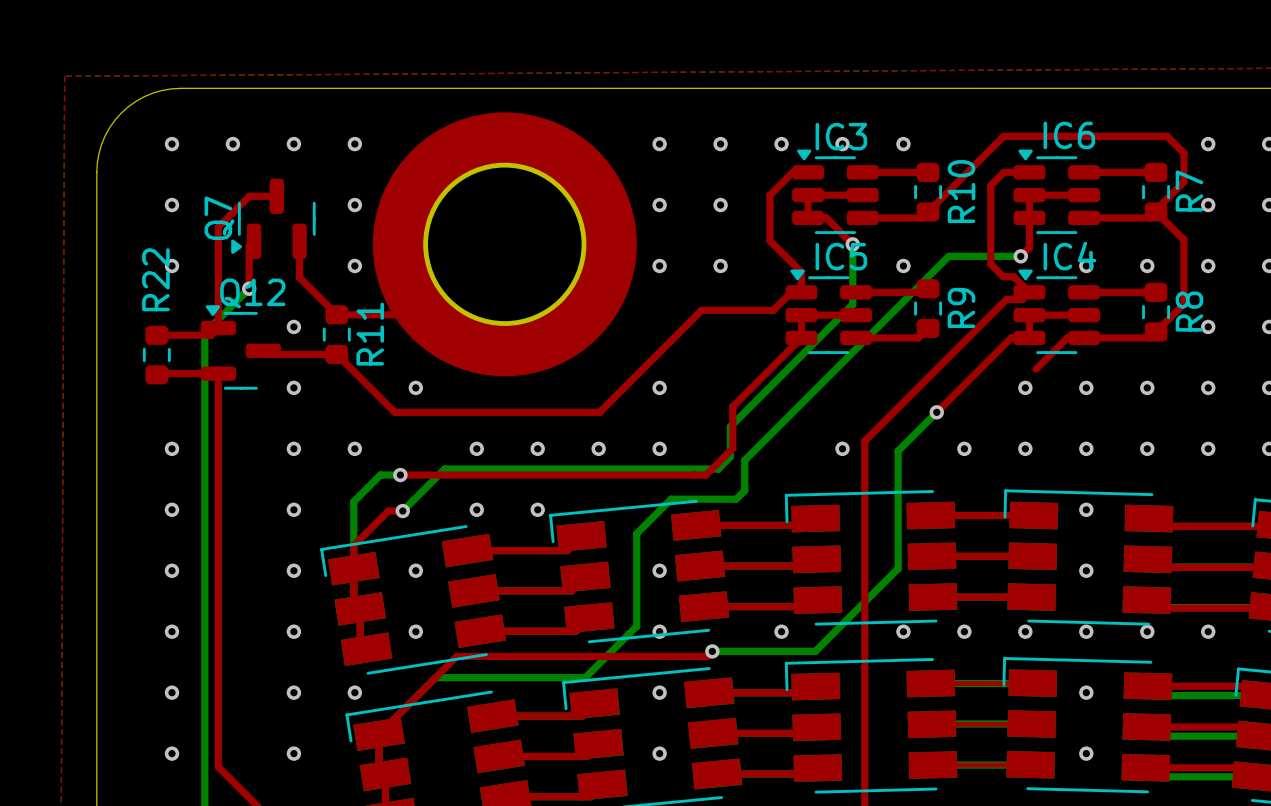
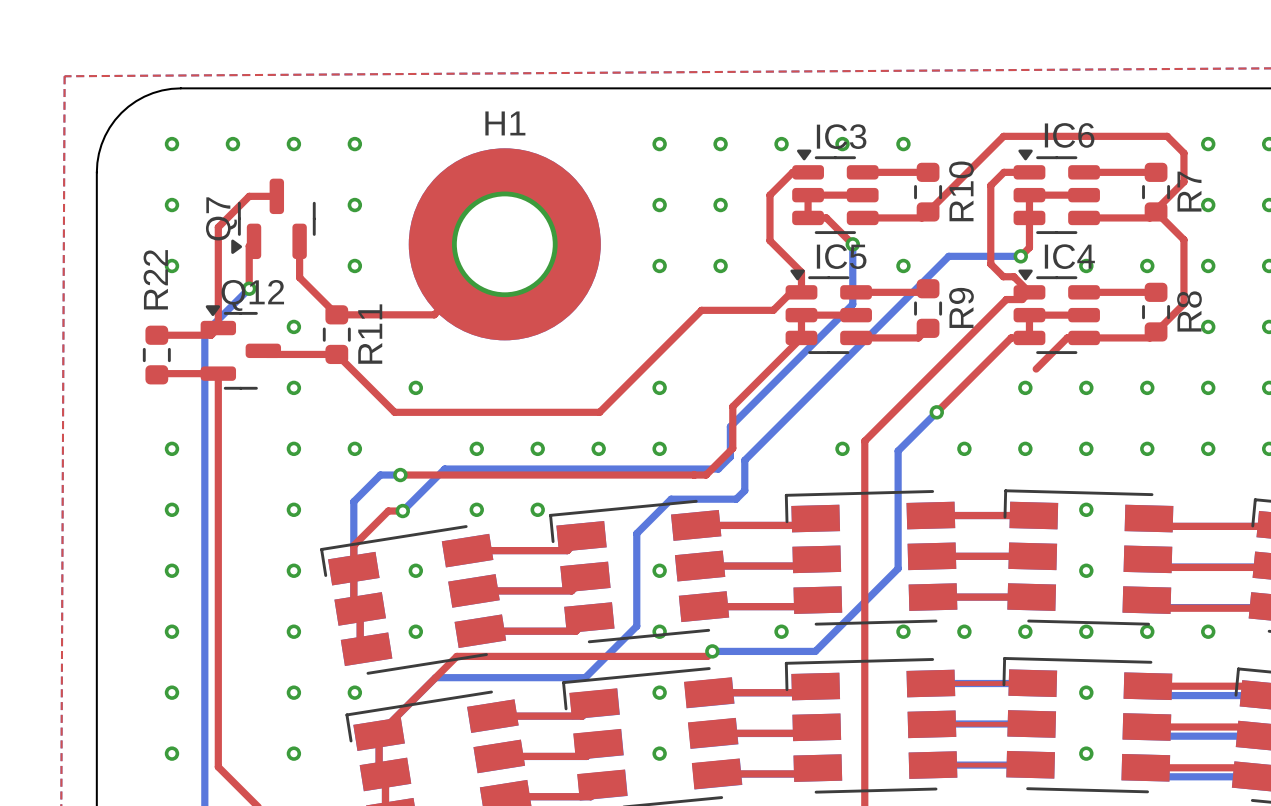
part: (504, 244) -> none
H1: none -> (504, 244)

